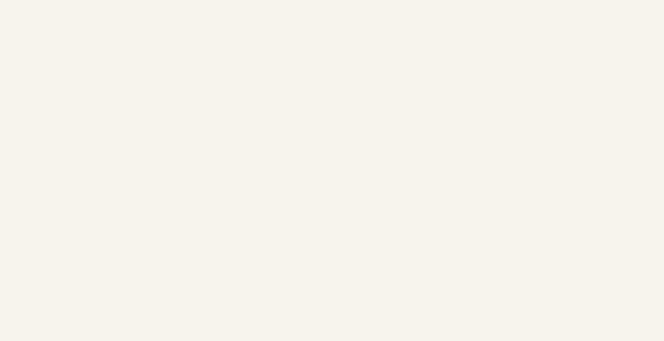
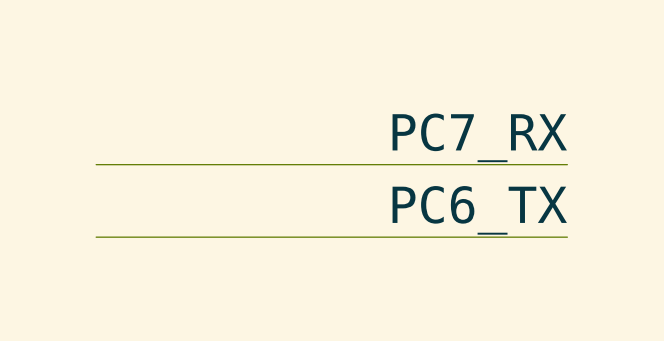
label: none -> PC7_RX (479, 137)
wire: none -> (96, 164) (567, 164)
label: none -> PC6_TX (479, 210)
wire: none -> (96, 237) (567, 237)

